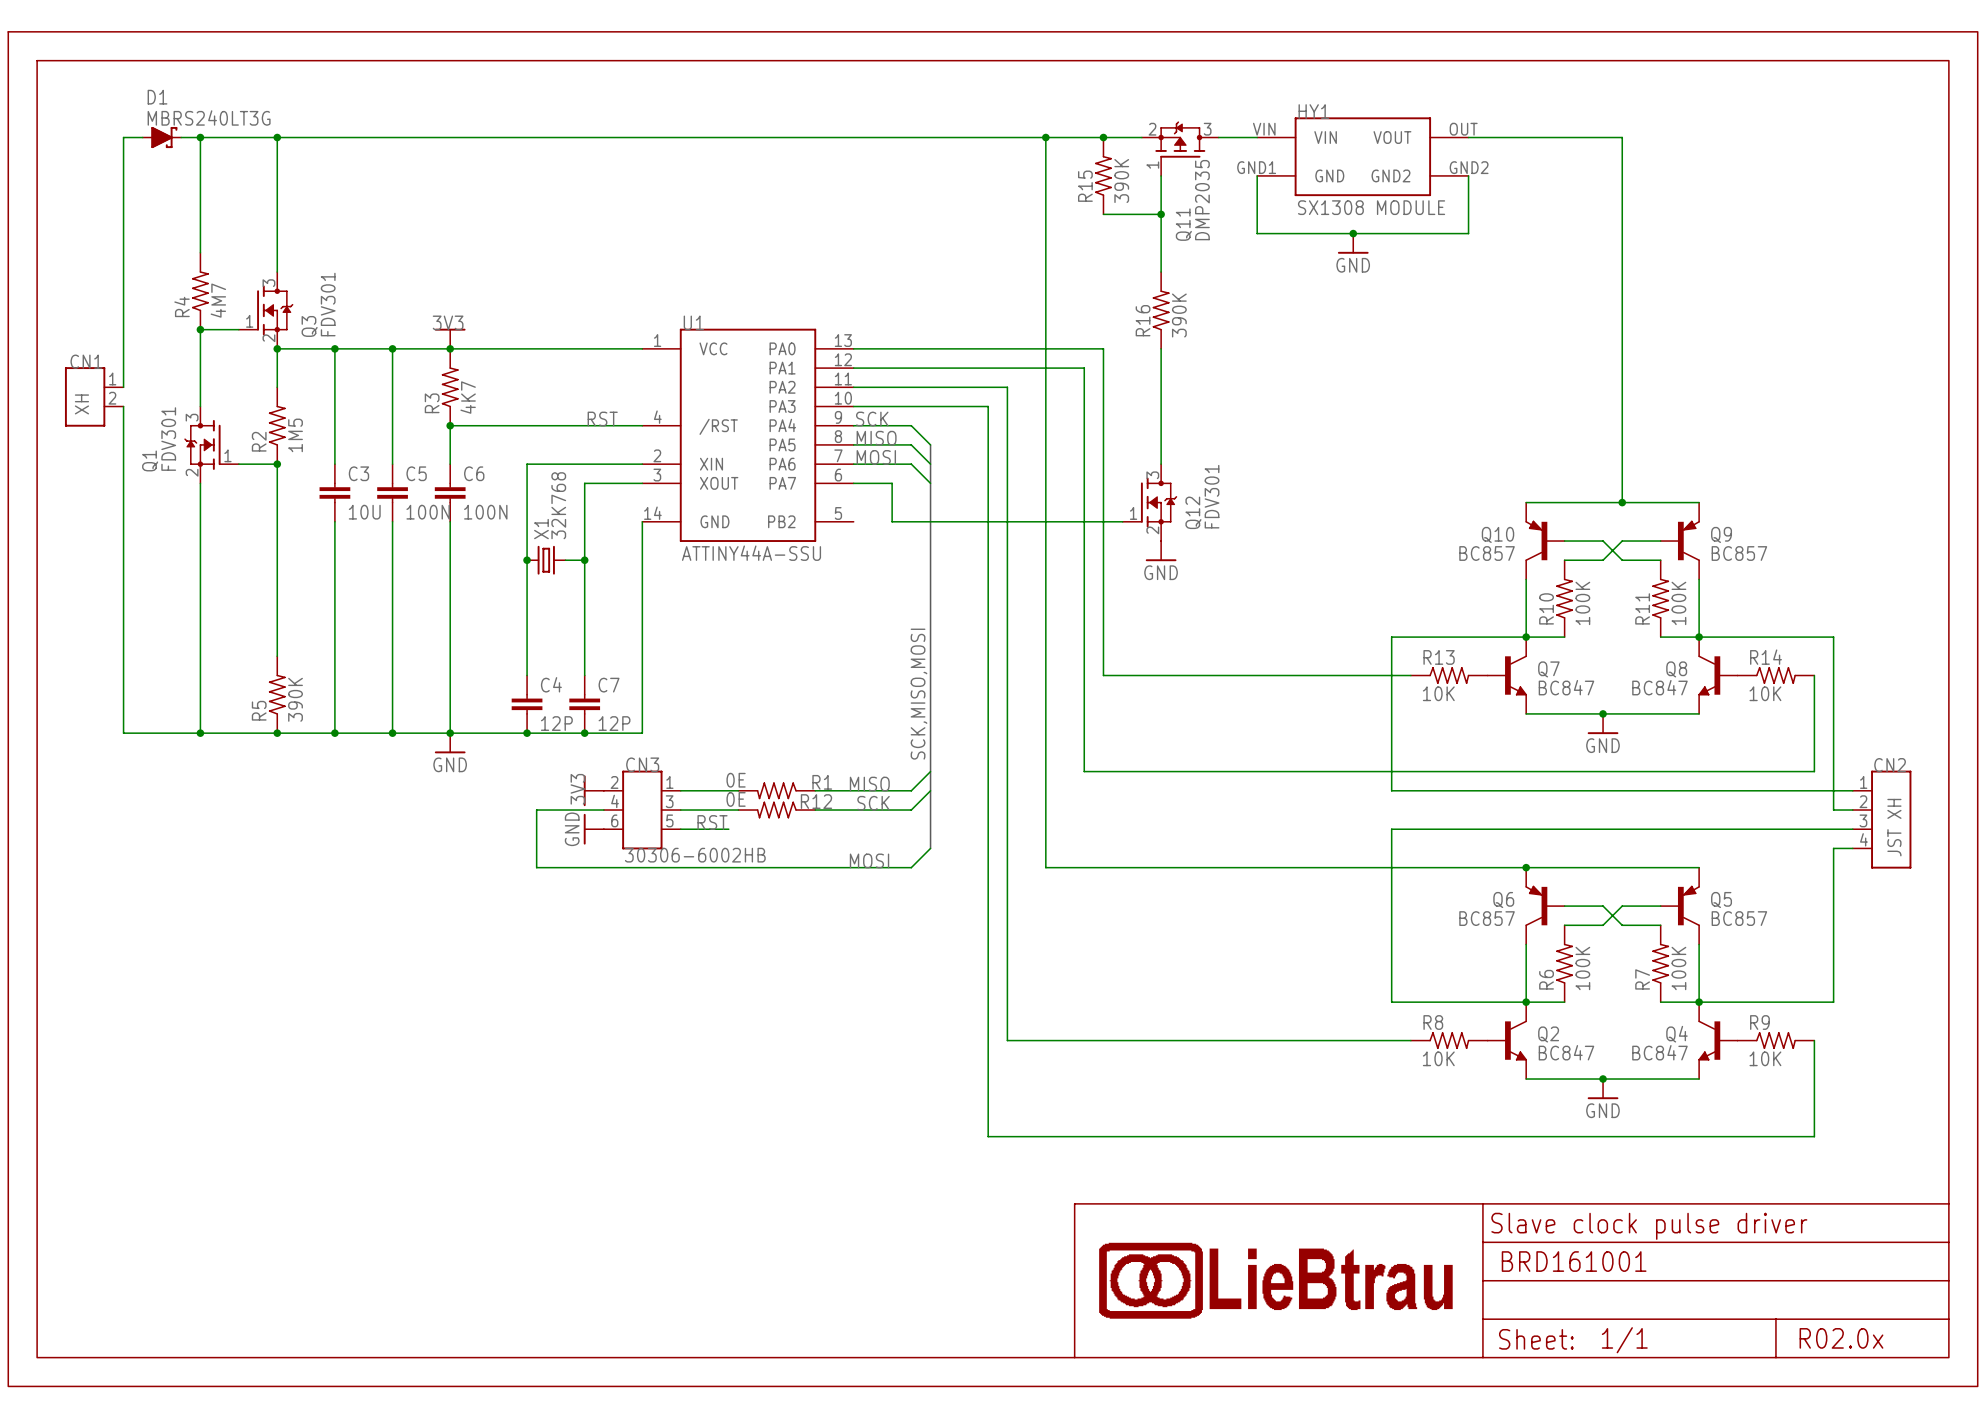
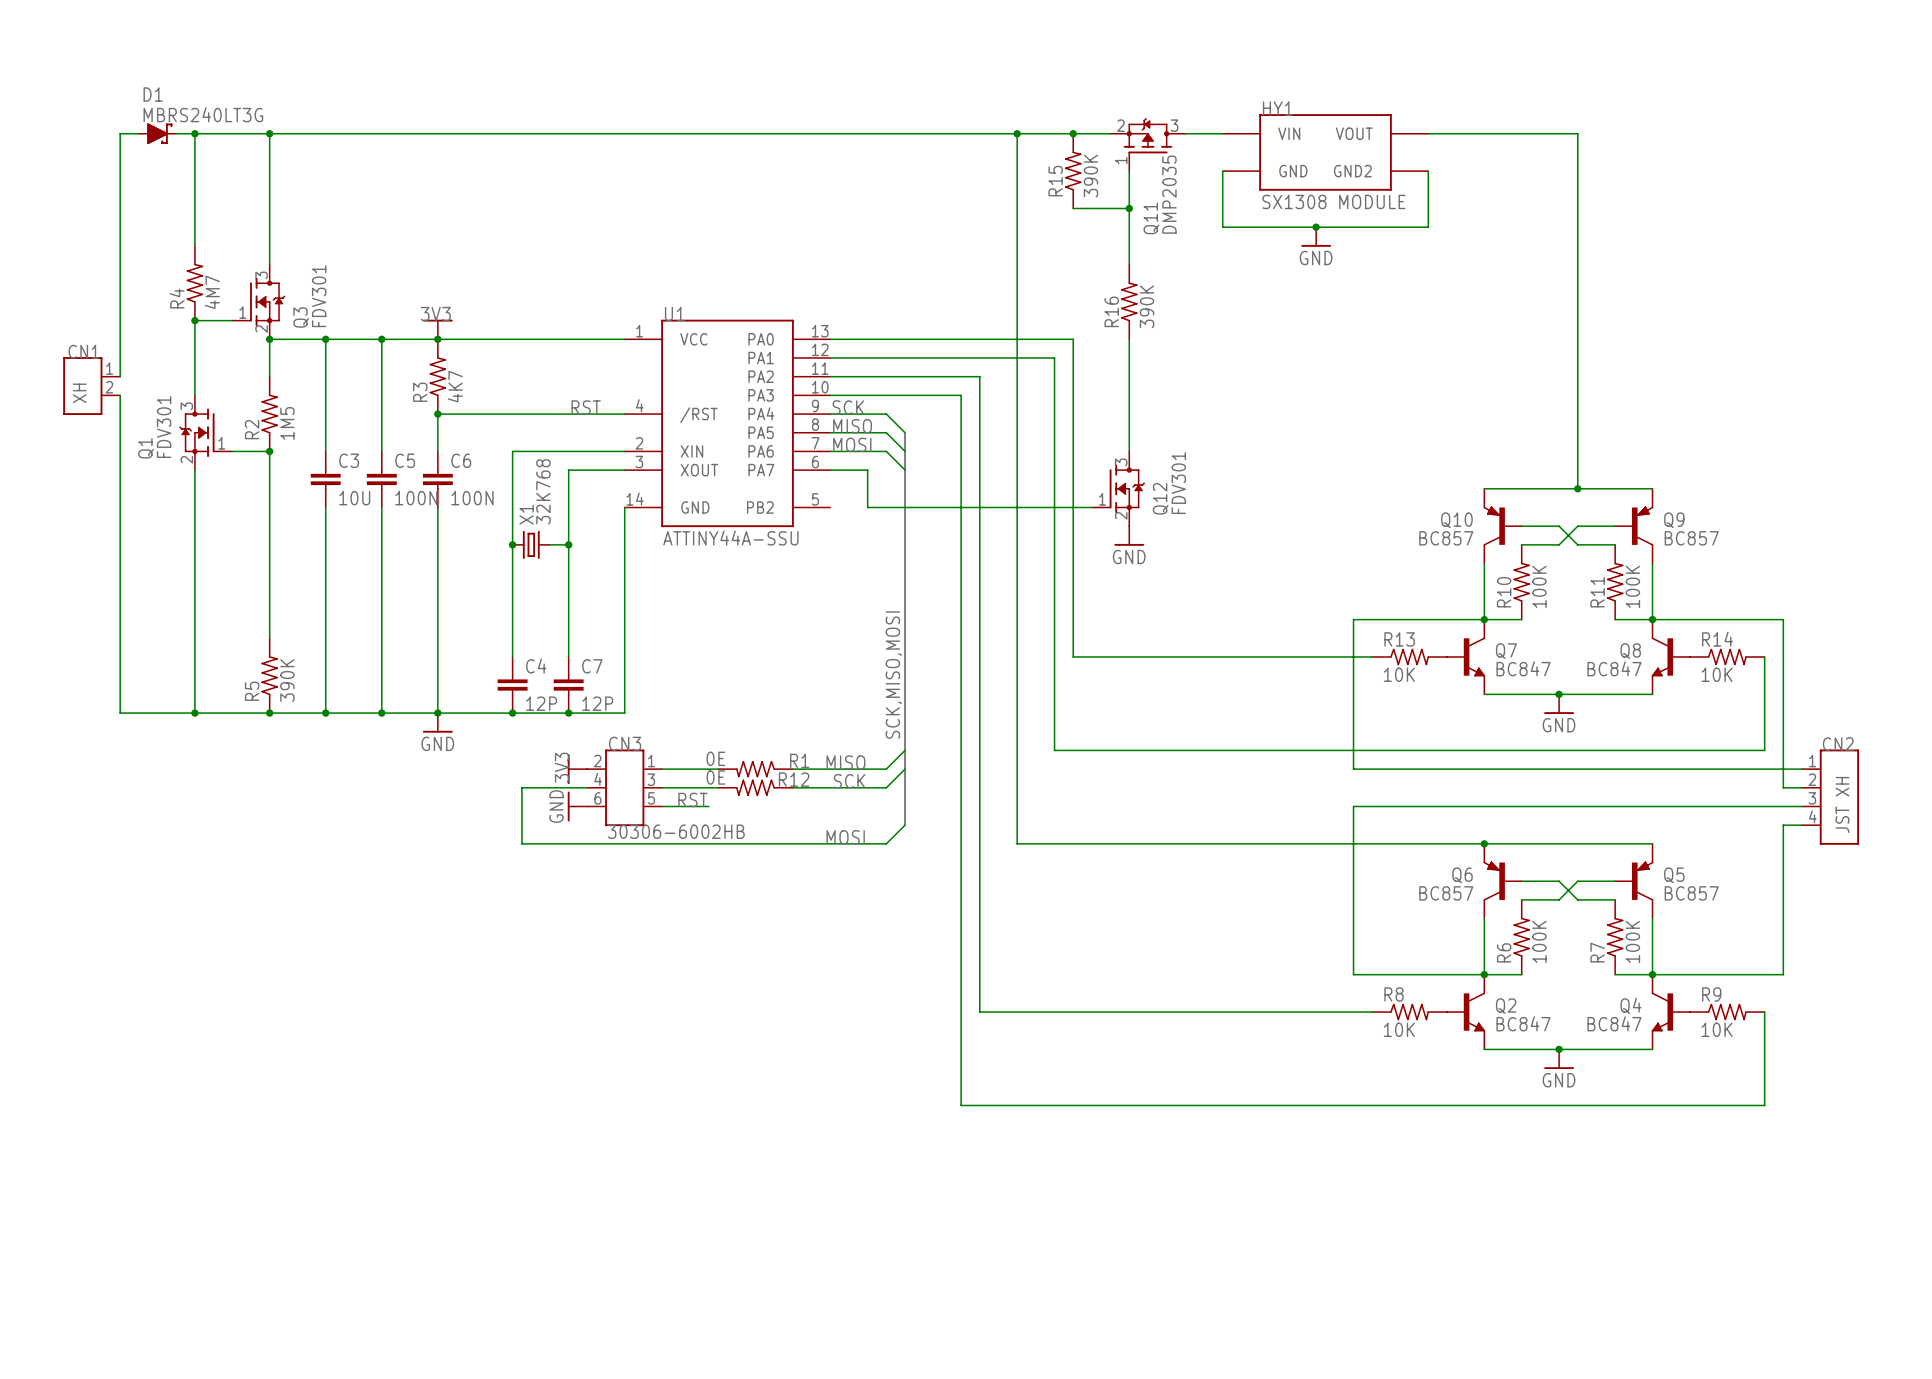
HY1 pin number: VIN (1264, 129) -> none
HY1 pin number: OUT (1463, 129) -> none
HY1 pin number: GND1 (1256, 167) -> none
HY1 pin number: GND2 (1469, 167) -> none
part: (992, 709) -> none

